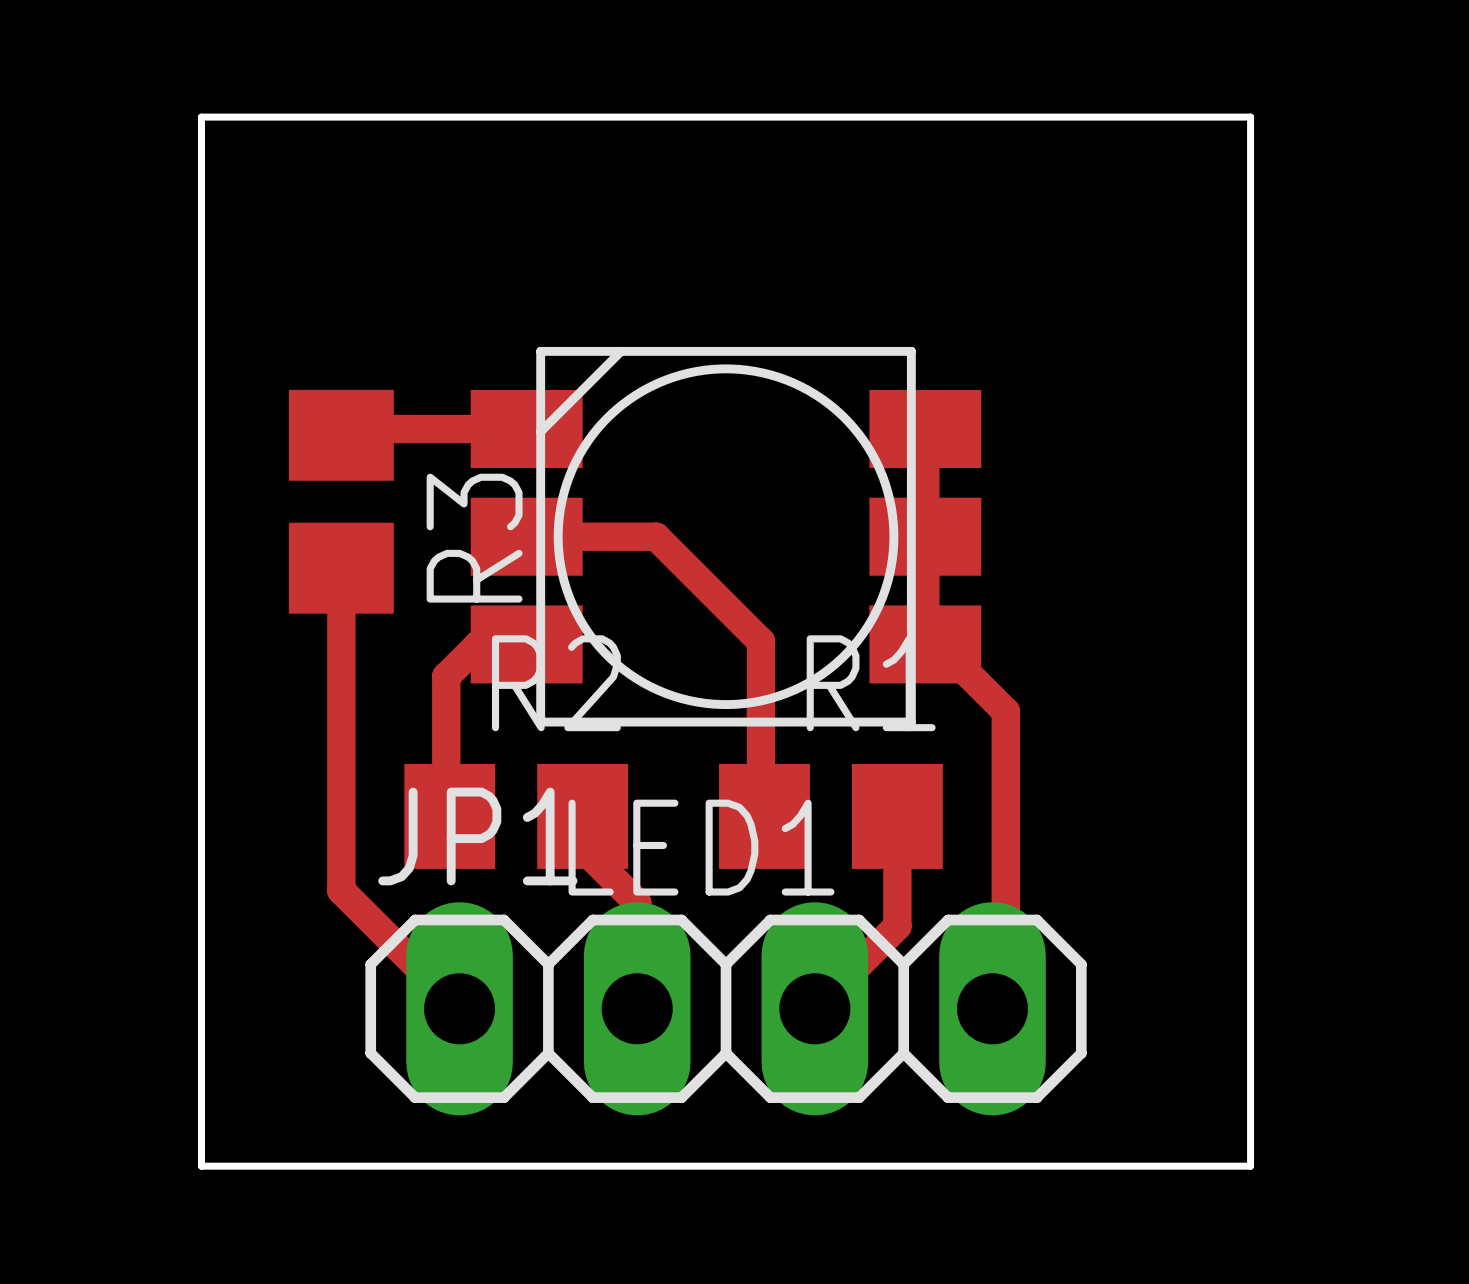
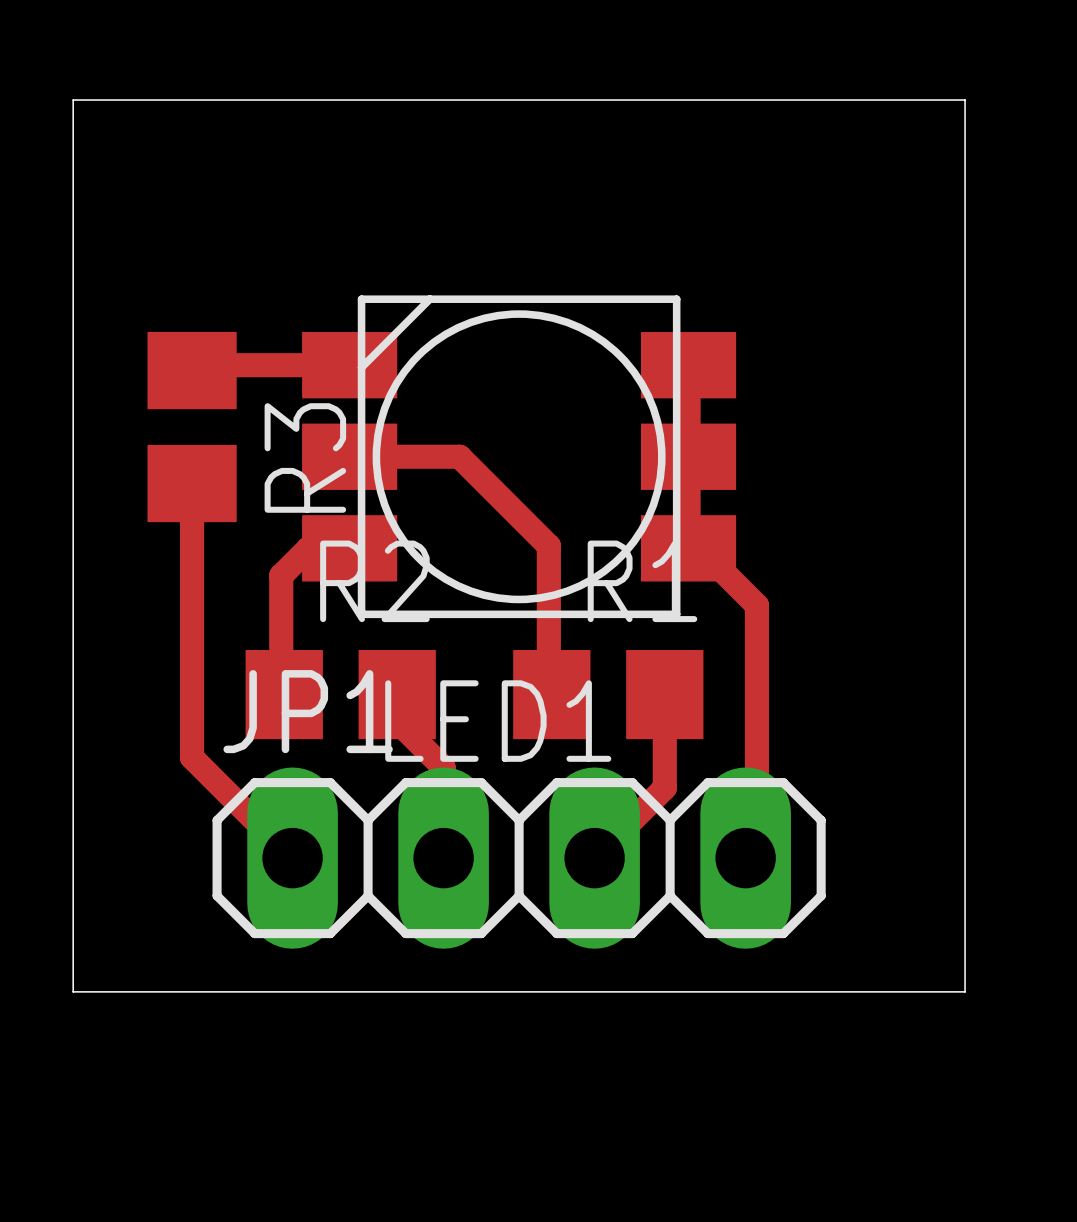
board edge width: thick (201, 117) (1250, 117) (1250, 1166) (201, 1166) (201, 117) -> thin (73, 100) (965, 100) (965, 991) (73, 991) (73, 100)

